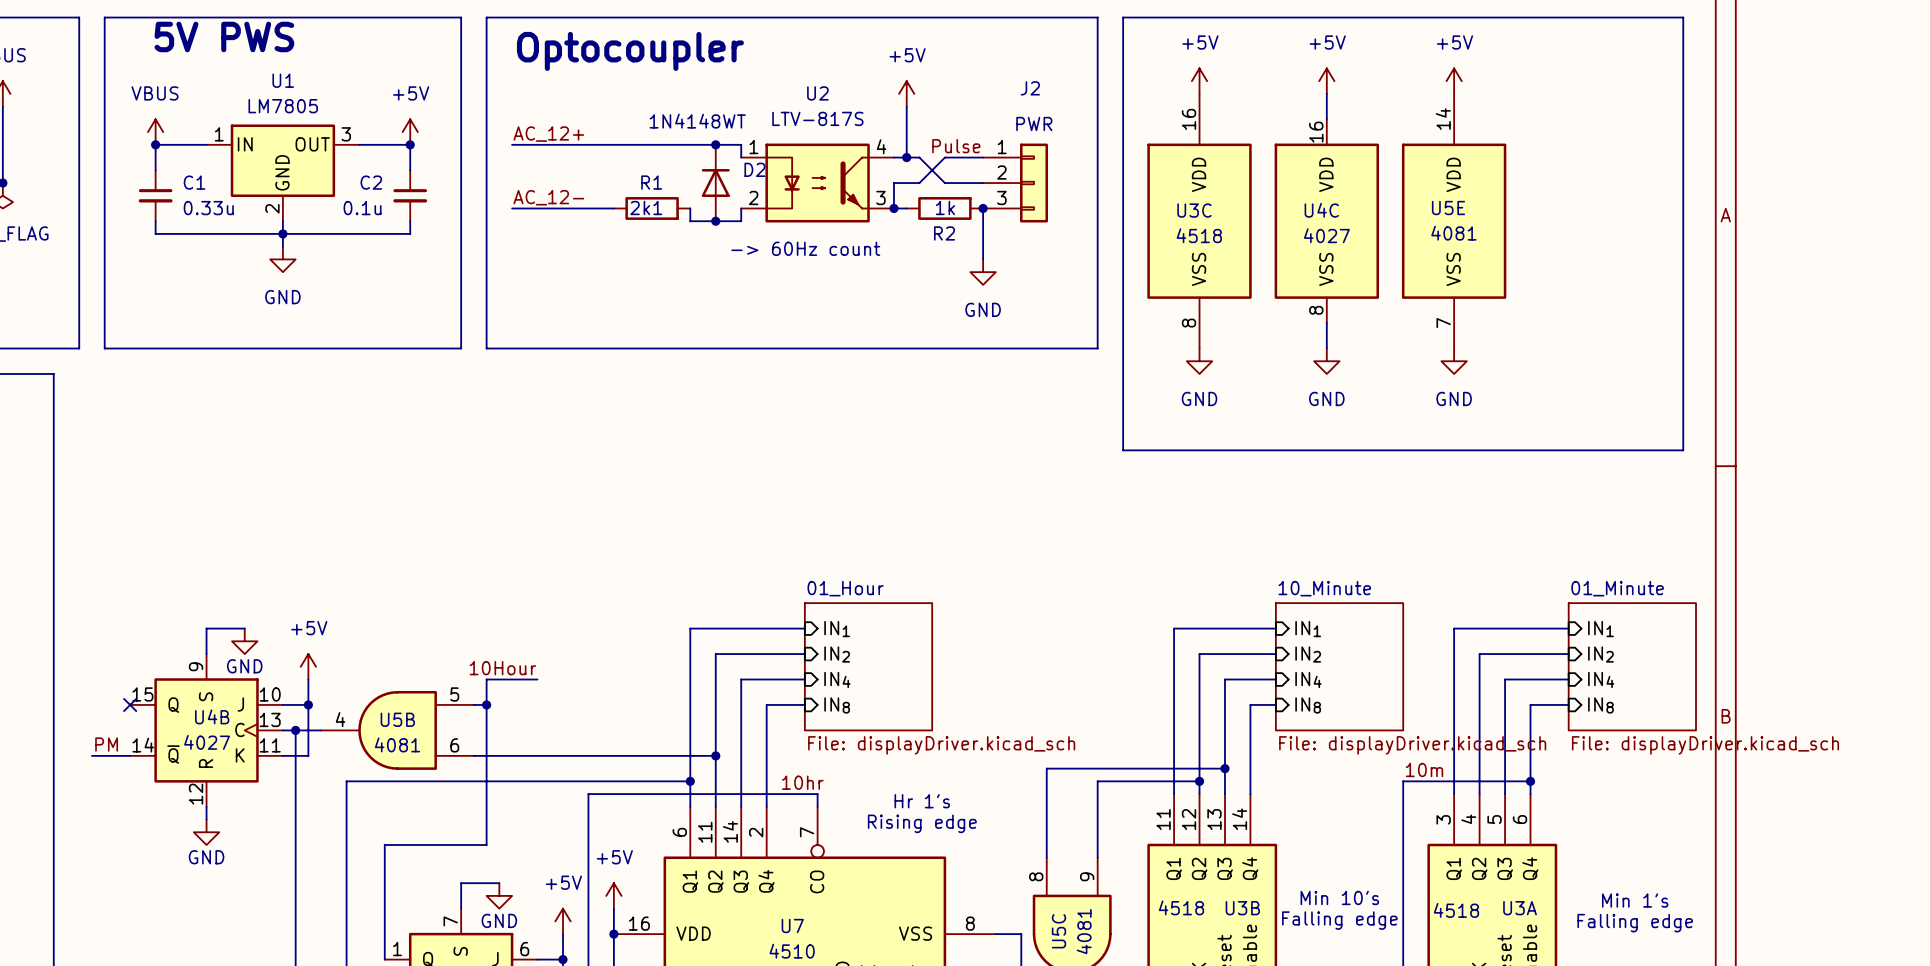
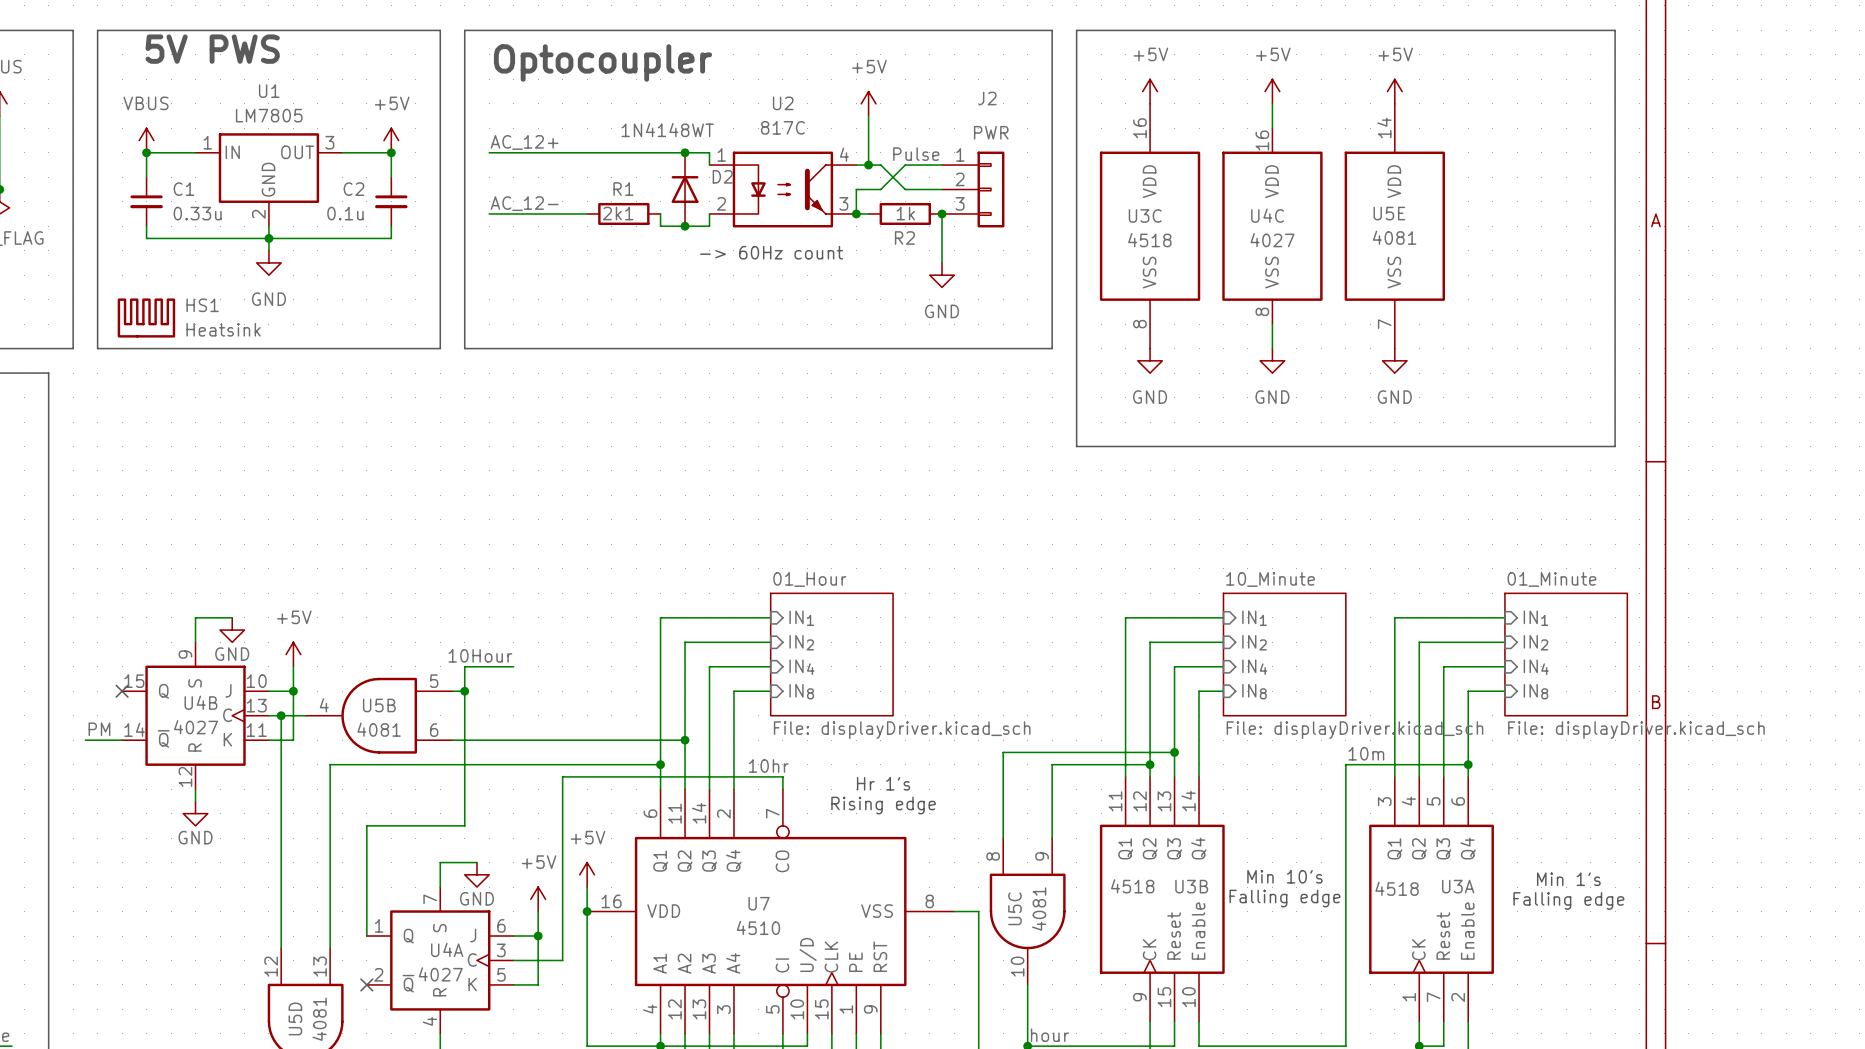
U2 value: LTV-817S (817, 118) -> 817C (782, 127)
HS1: none -> Heatsink (146, 318)

